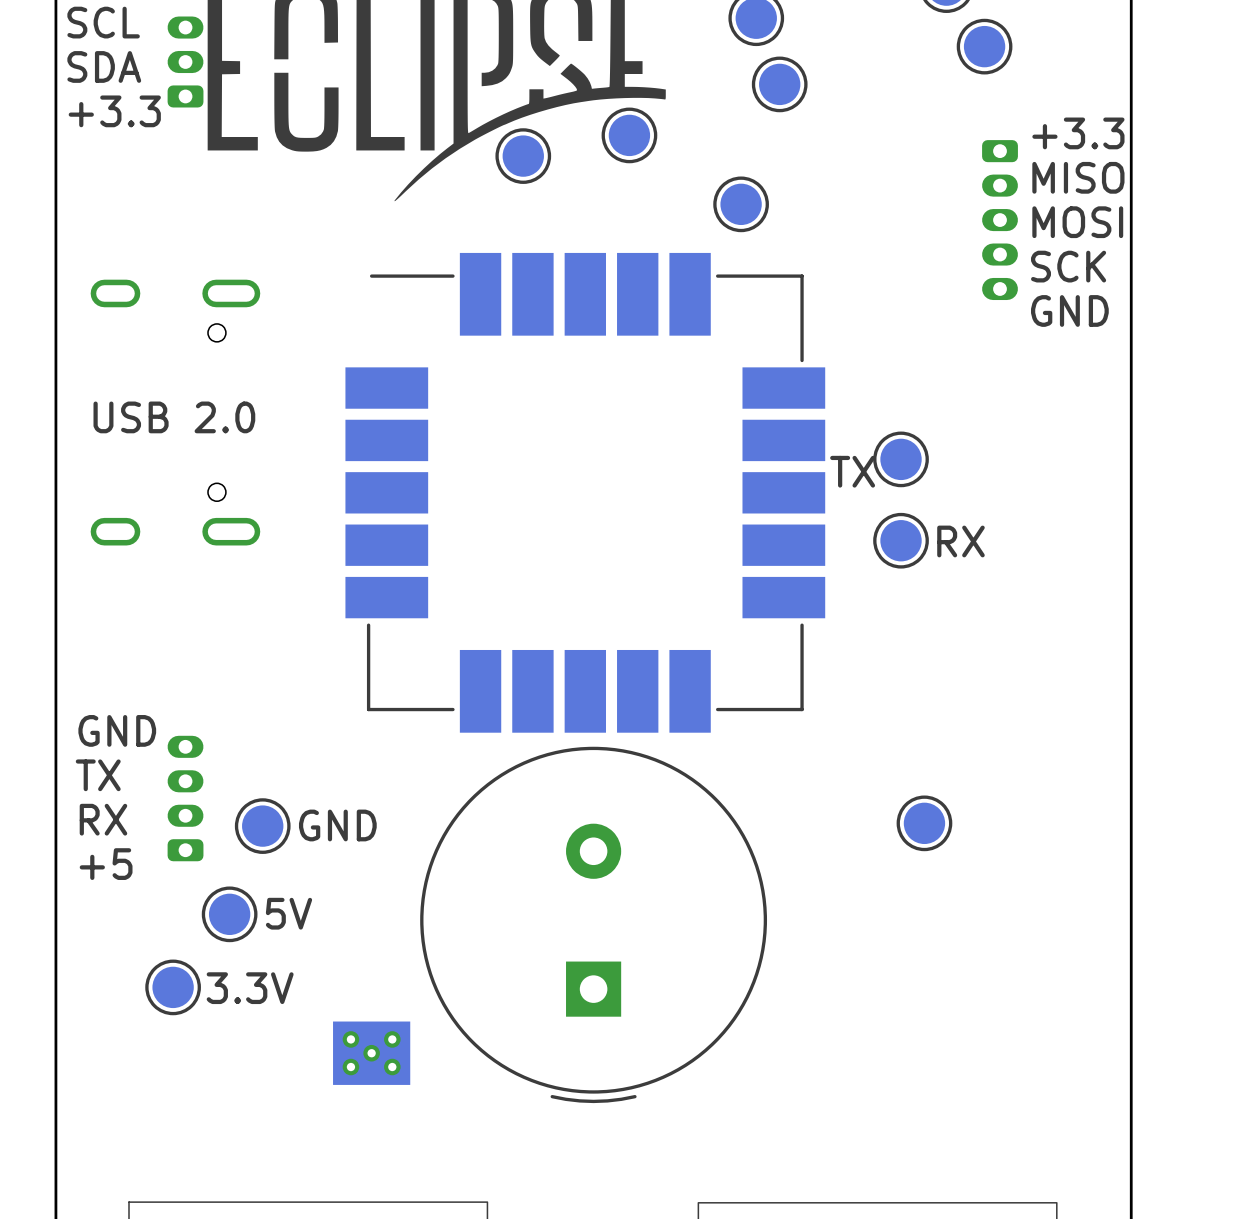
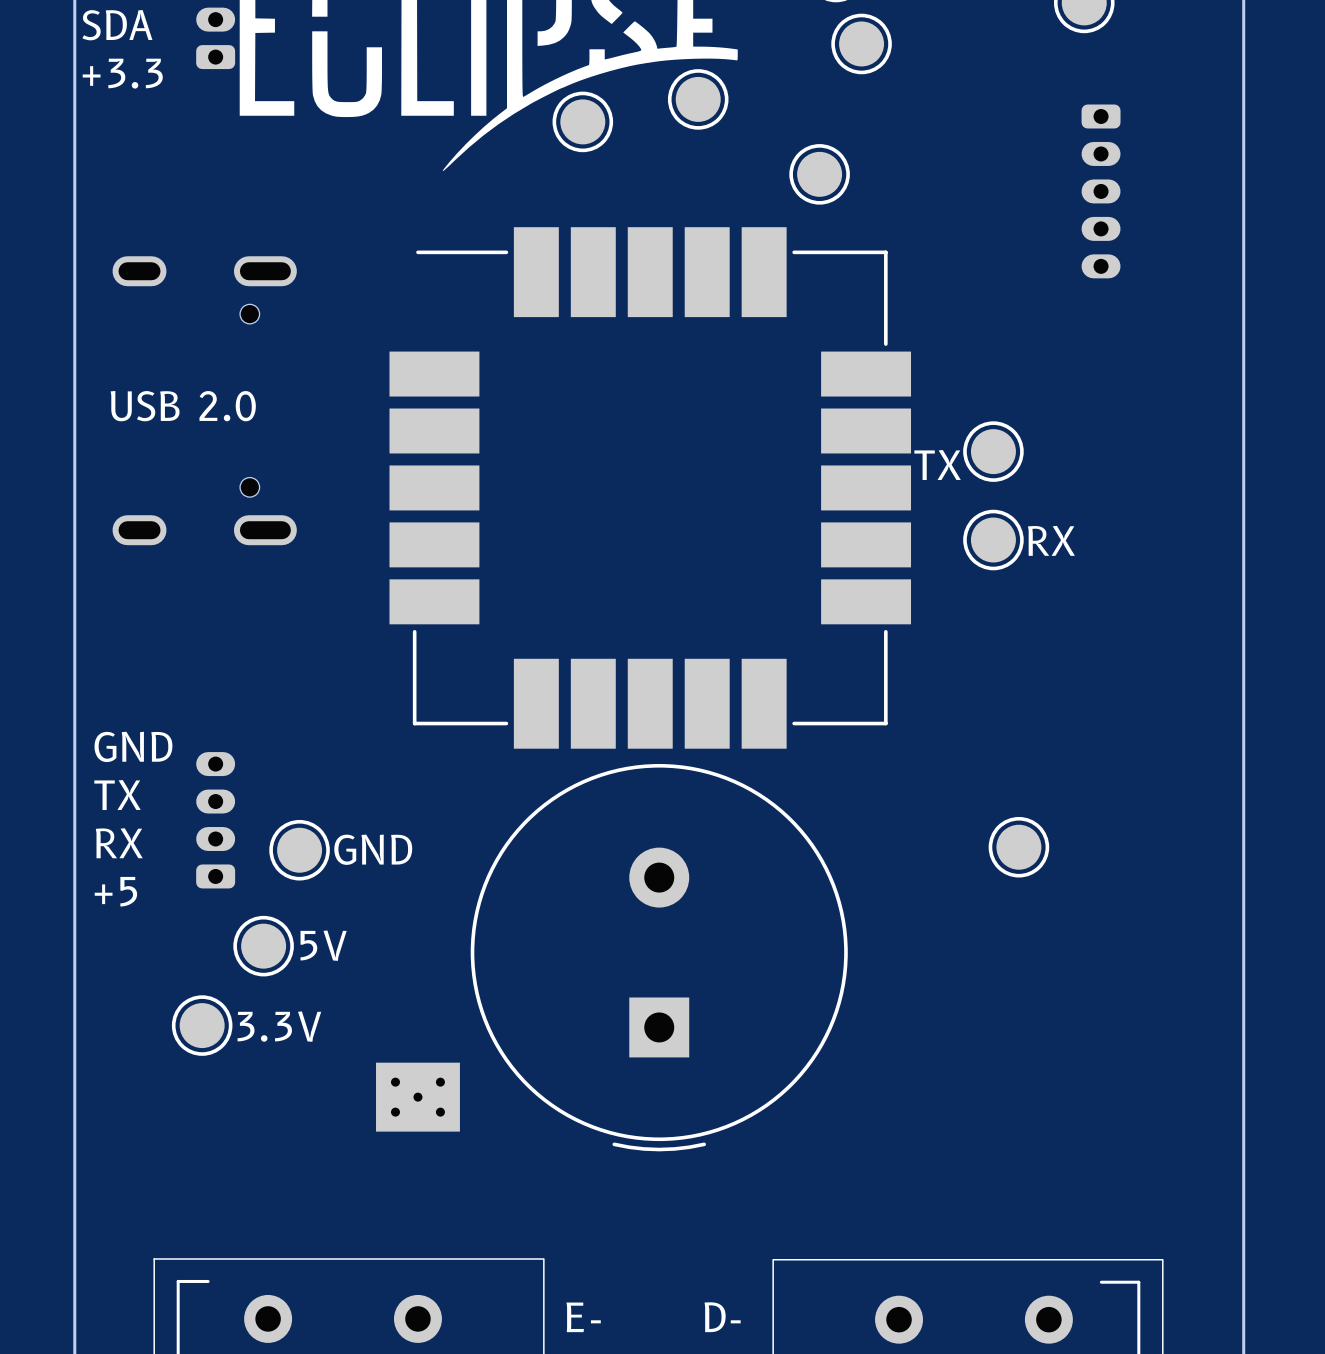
text: +3.3 (1078, 133) -> none
text: MISO (1078, 177) -> none
text: MOSI (1077, 222) -> none
text: SCK (1068, 266) -> none
text: GND (1069, 310) -> none

